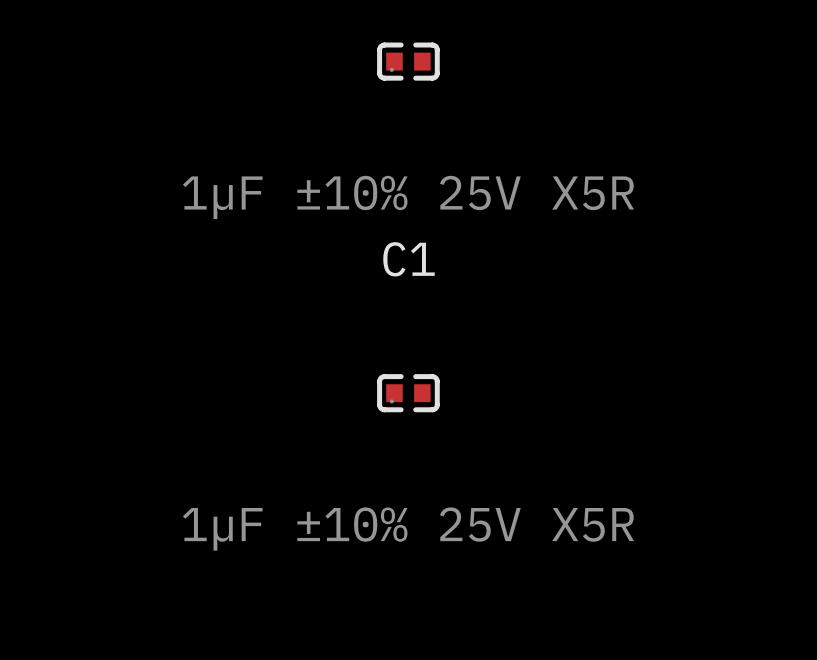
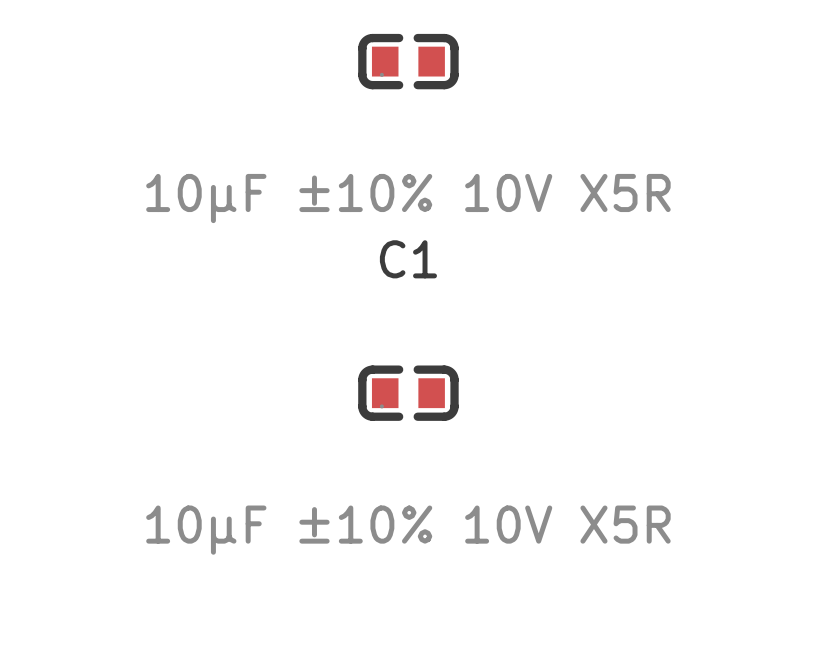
part footprint: [377, 42, 440, 81] -> [358, 33, 459, 90]
part value: 1µF ±10% 25V X5R (408, 197) -> 10µF ±10% 10V X5R (408, 198)
C1 footprint: [377, 374, 440, 413] -> [358, 365, 459, 421]
C1 value: 1µF ±10% 25V X5R (408, 529) -> 10µF ±10% 10V X5R (408, 530)

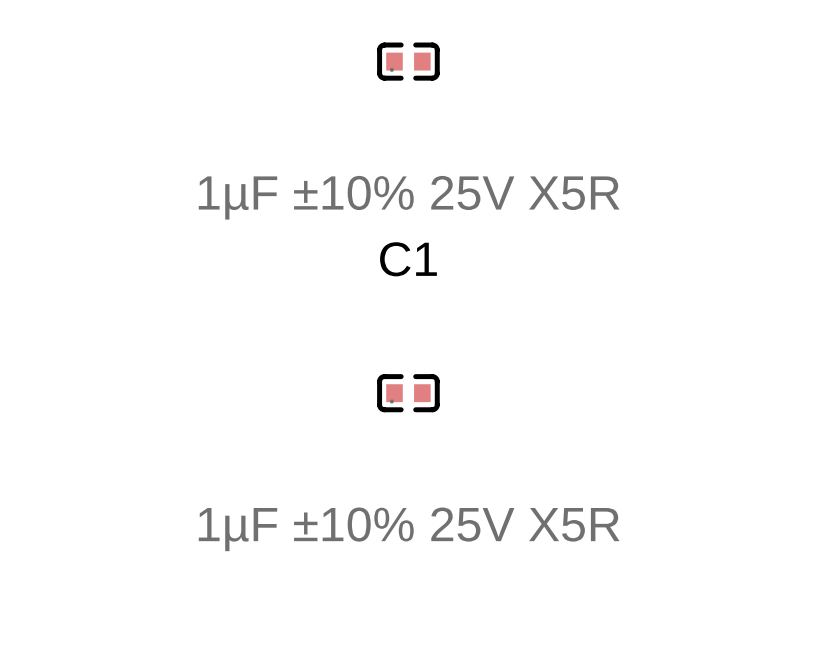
part footprint: [358, 33, 459, 90] -> [377, 42, 440, 81]
part value: 10µF ±10% 10V X5R (408, 198) -> 1µF ±10% 25V X5R (409, 197)
C1 footprint: [358, 365, 459, 421] -> [377, 374, 440, 413]
C1 value: 10µF ±10% 10V X5R (408, 530) -> 1µF ±10% 25V X5R (409, 529)

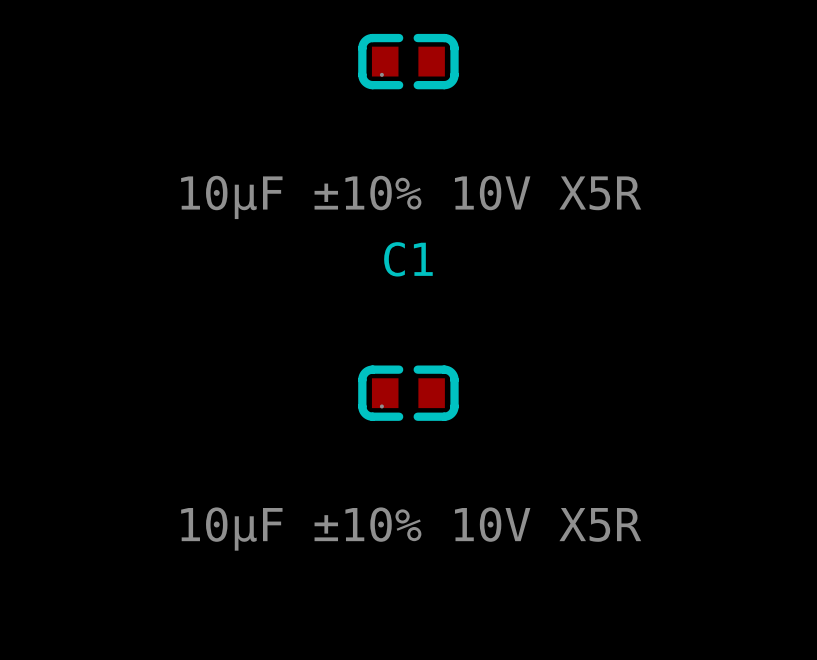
part footprint: [377, 42, 440, 81] -> [358, 33, 459, 90]
part value: 1µF ±10% 25V X5R (409, 197) -> 10µF ±10% 10V X5R (411, 197)
C1 footprint: [377, 374, 440, 413] -> [358, 365, 459, 421]
C1 value: 1µF ±10% 25V X5R (409, 529) -> 10µF ±10% 10V X5R (411, 529)

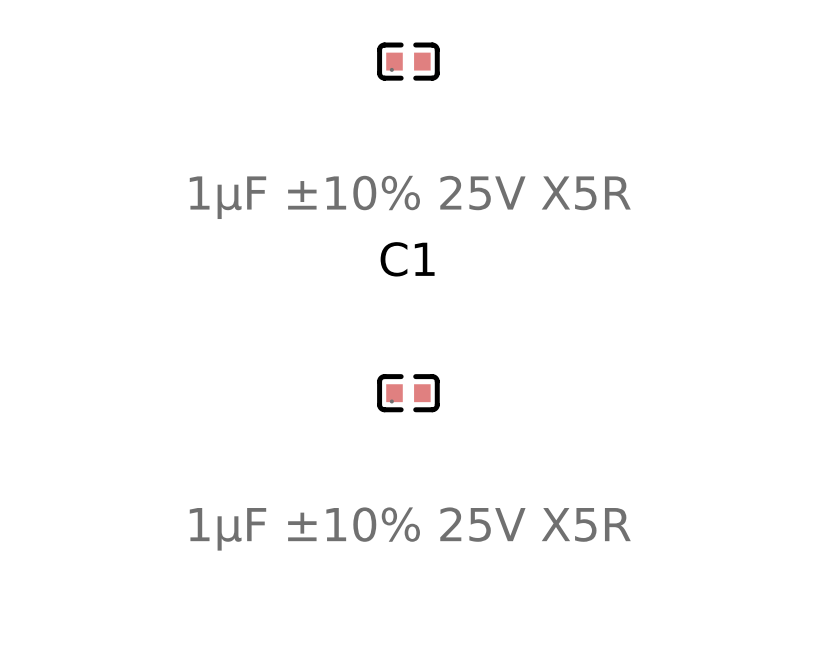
part footprint: [358, 33, 459, 90] -> [377, 42, 440, 81]
part value: 10µF ±10% 10V X5R (411, 197) -> 1µF ±10% 25V X5R (410, 197)
C1 footprint: [358, 365, 459, 421] -> [377, 374, 440, 413]
C1 value: 10µF ±10% 10V X5R (411, 529) -> 1µF ±10% 25V X5R (410, 529)

